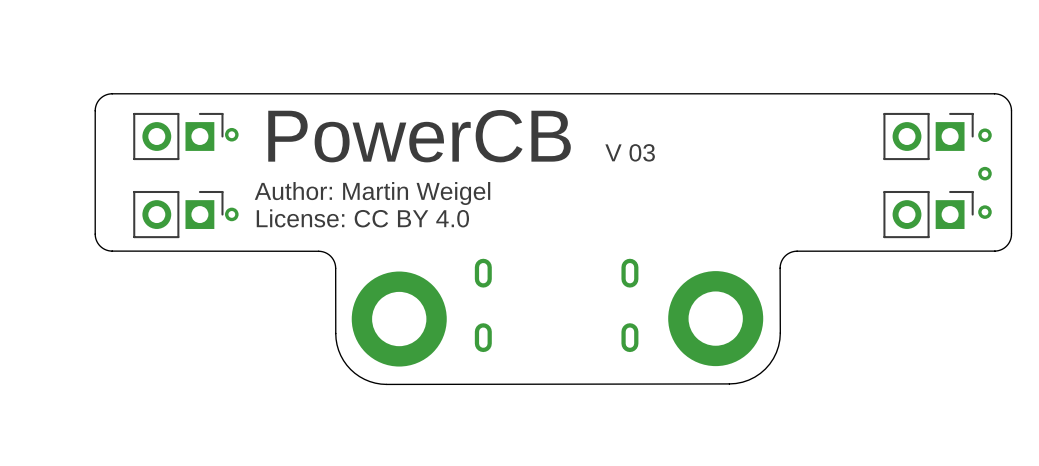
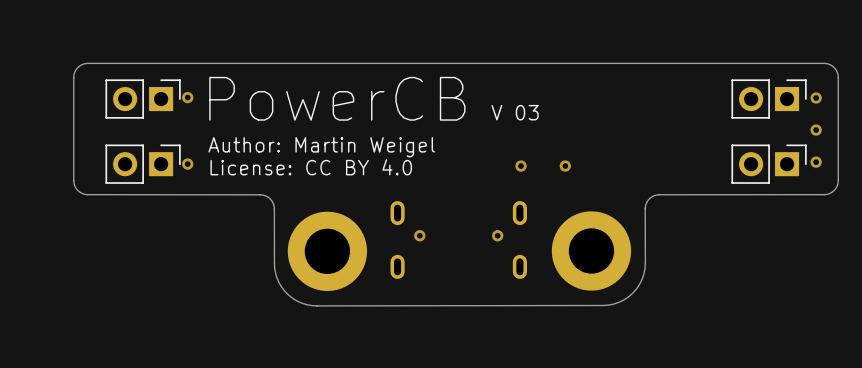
via: none -> (521, 166)
via: none -> (565, 166)
via: none -> (419, 235)
via: none -> (497, 235)

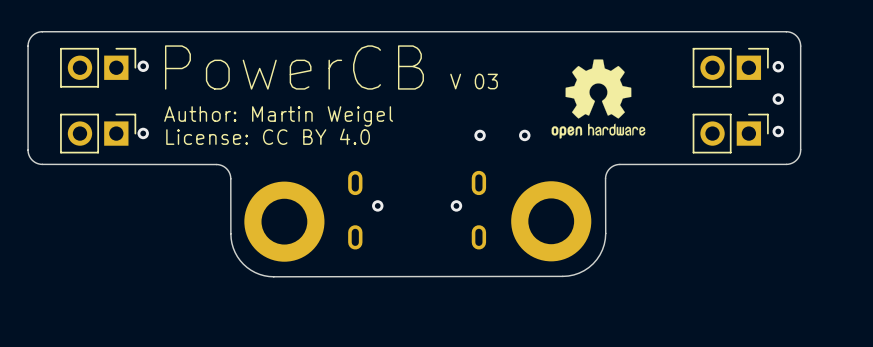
drawing: none -> [551, 59, 646, 139]

